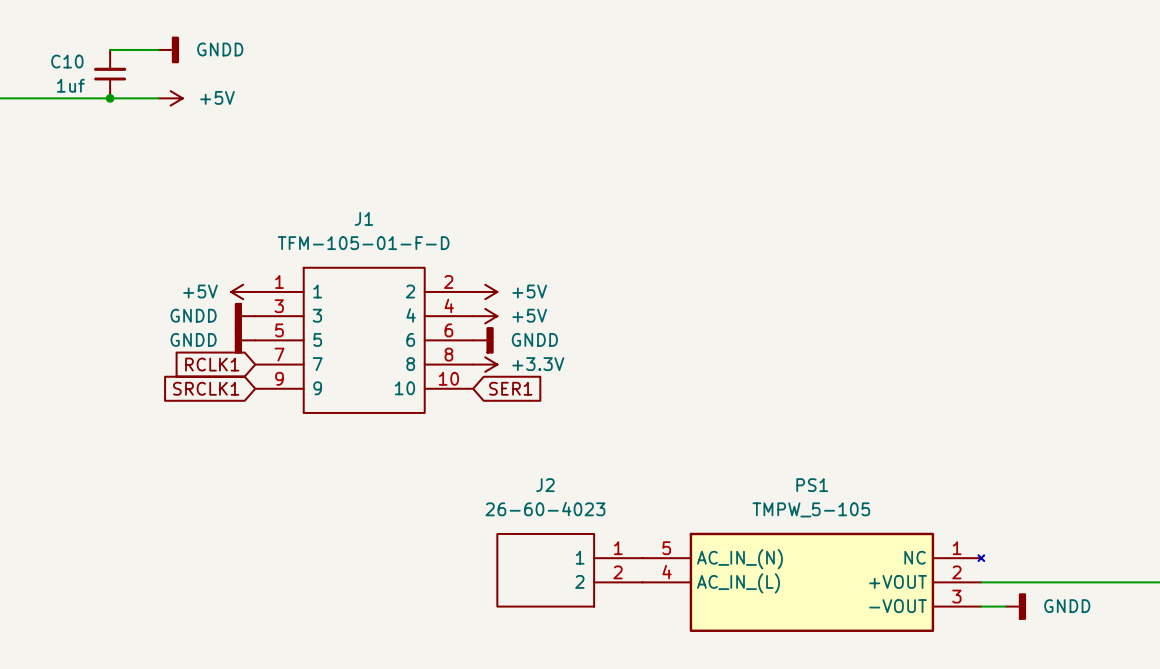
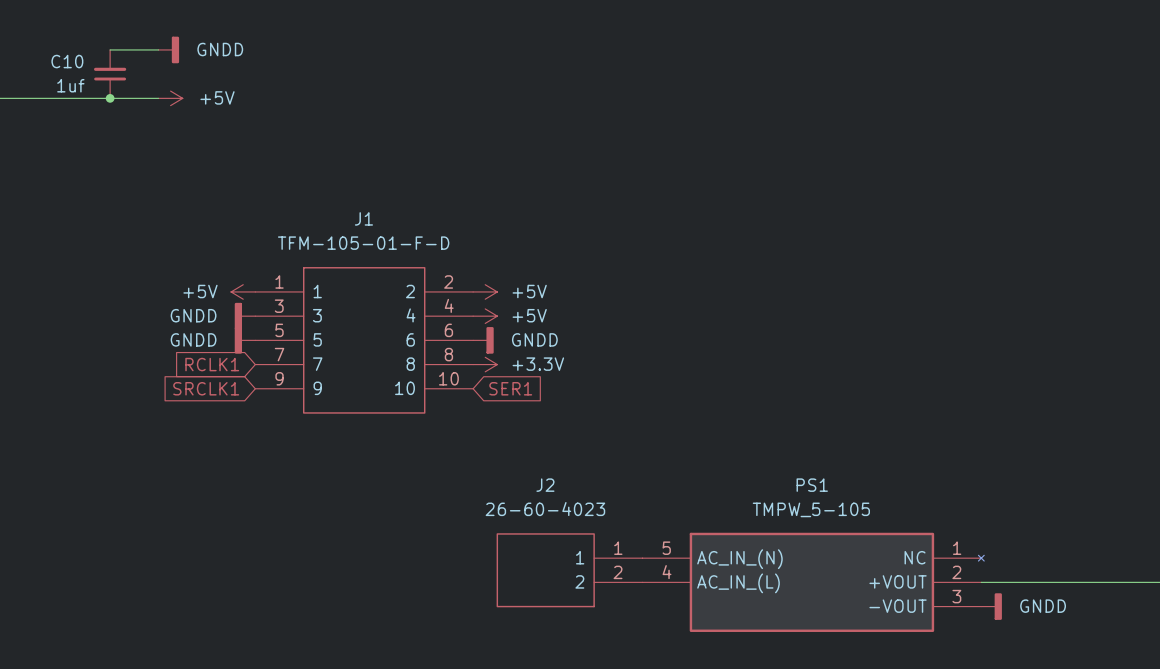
power symbol position: GNDD (1015, 606) -> GNDD (991, 606)

